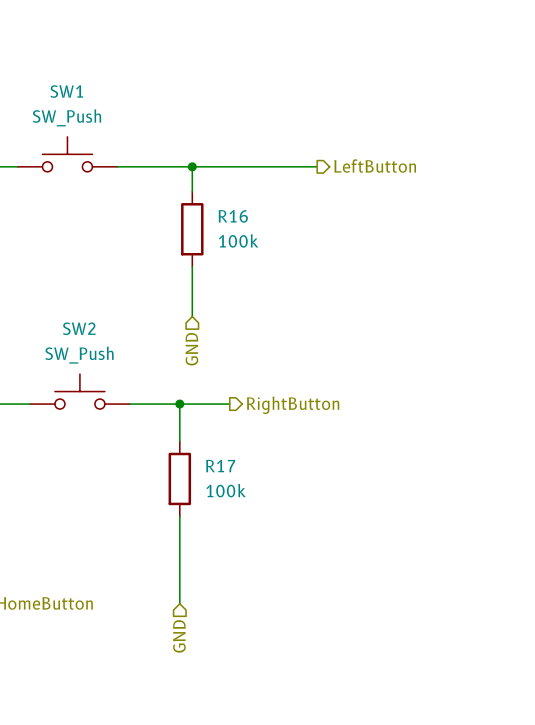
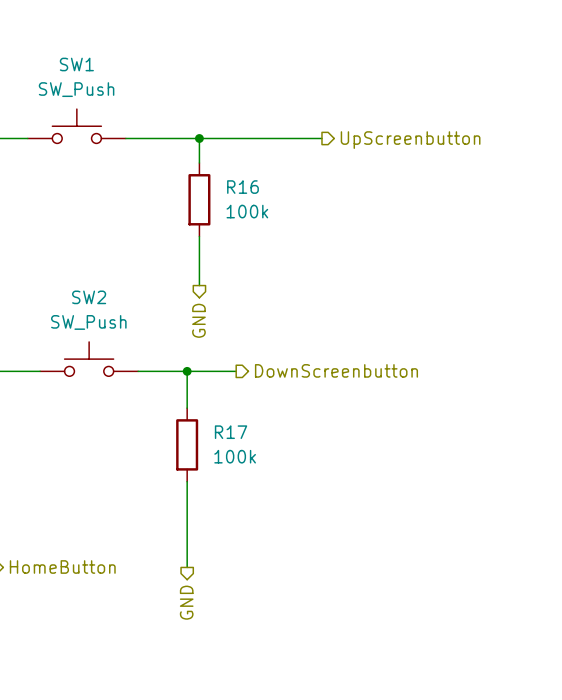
hierarchical label: LeftButton (375, 166) -> UpScreenbutton (410, 140)
hierarchical label shape: input (191, 349) -> output (198, 320)
hierarchical label: RightButton (293, 405) -> DownScreenbutton (336, 370)
hierarchical label shape: input (179, 636) -> output (186, 602)

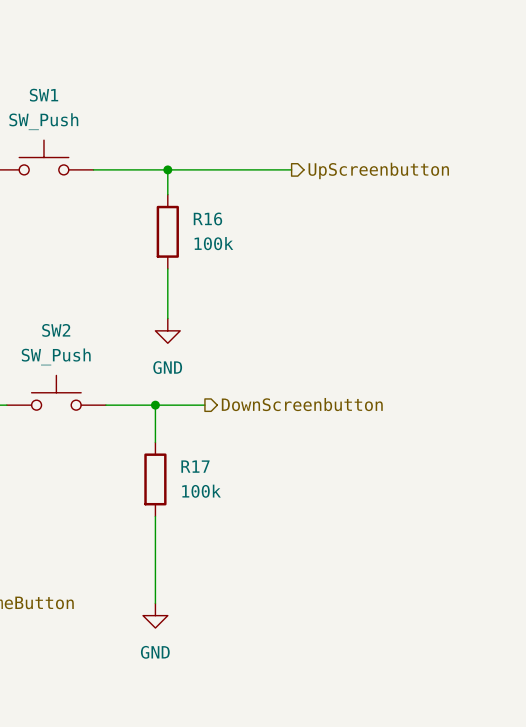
power symbol: none -> GND (167, 330)
hierarchical label: GND (198, 320) -> none
power symbol: none -> GND (155, 615)
hierarchical label: GND (186, 602) -> none

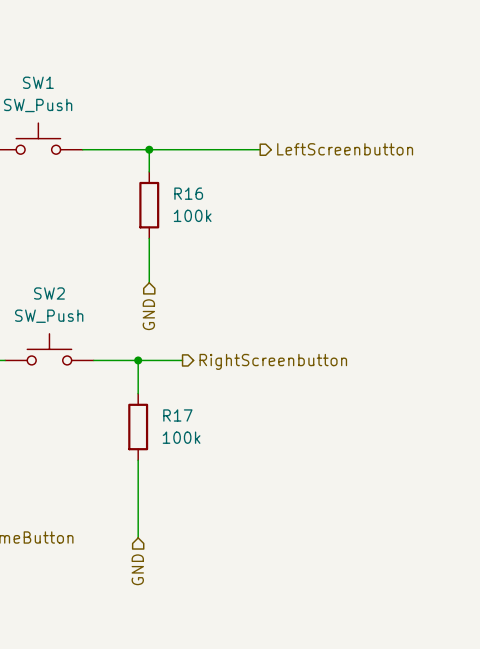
hierarchical label: UpScreenbutton (378, 170) -> LeftScreenbutton (345, 149)
power symbol: GND (167, 330) -> none
hierarchical label: none -> GND (148, 314)
hierarchical label: DownScreenbutton (302, 404) -> RightScreenbutton (273, 361)
power symbol: GND (155, 615) -> none
hierarchical label: none -> GND (137, 569)

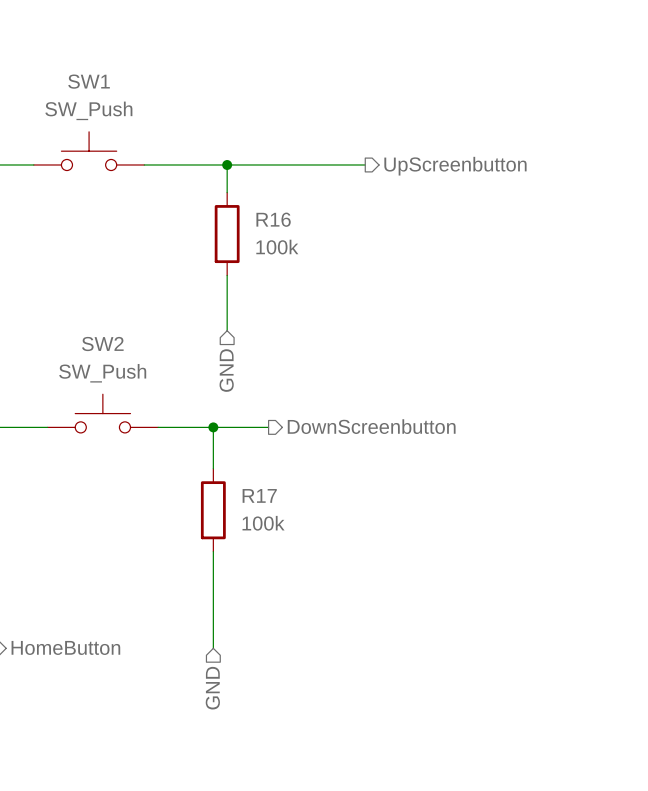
hierarchical label: LeftScreenbutton (345, 149) -> UpScreenbutton (455, 166)
hierarchical label: RightScreenbutton (273, 361) -> DownScreenbutton (371, 426)

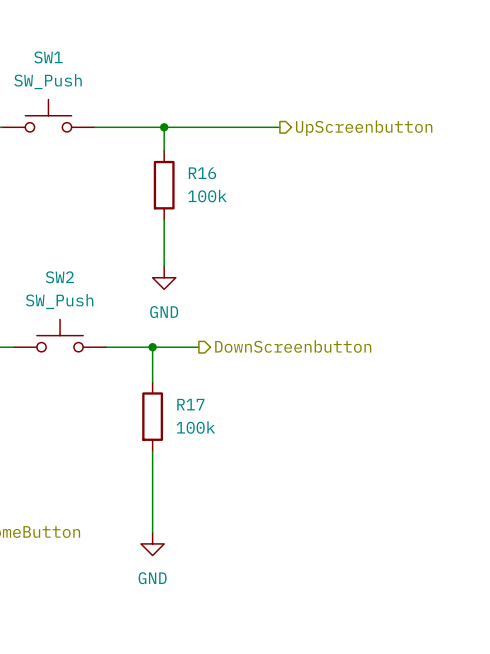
power symbol: none -> GND (164, 277)
hierarchical label: GND (226, 370) -> none
power symbol: none -> GND (152, 543)
hierarchical label: GND (212, 688) -> none

